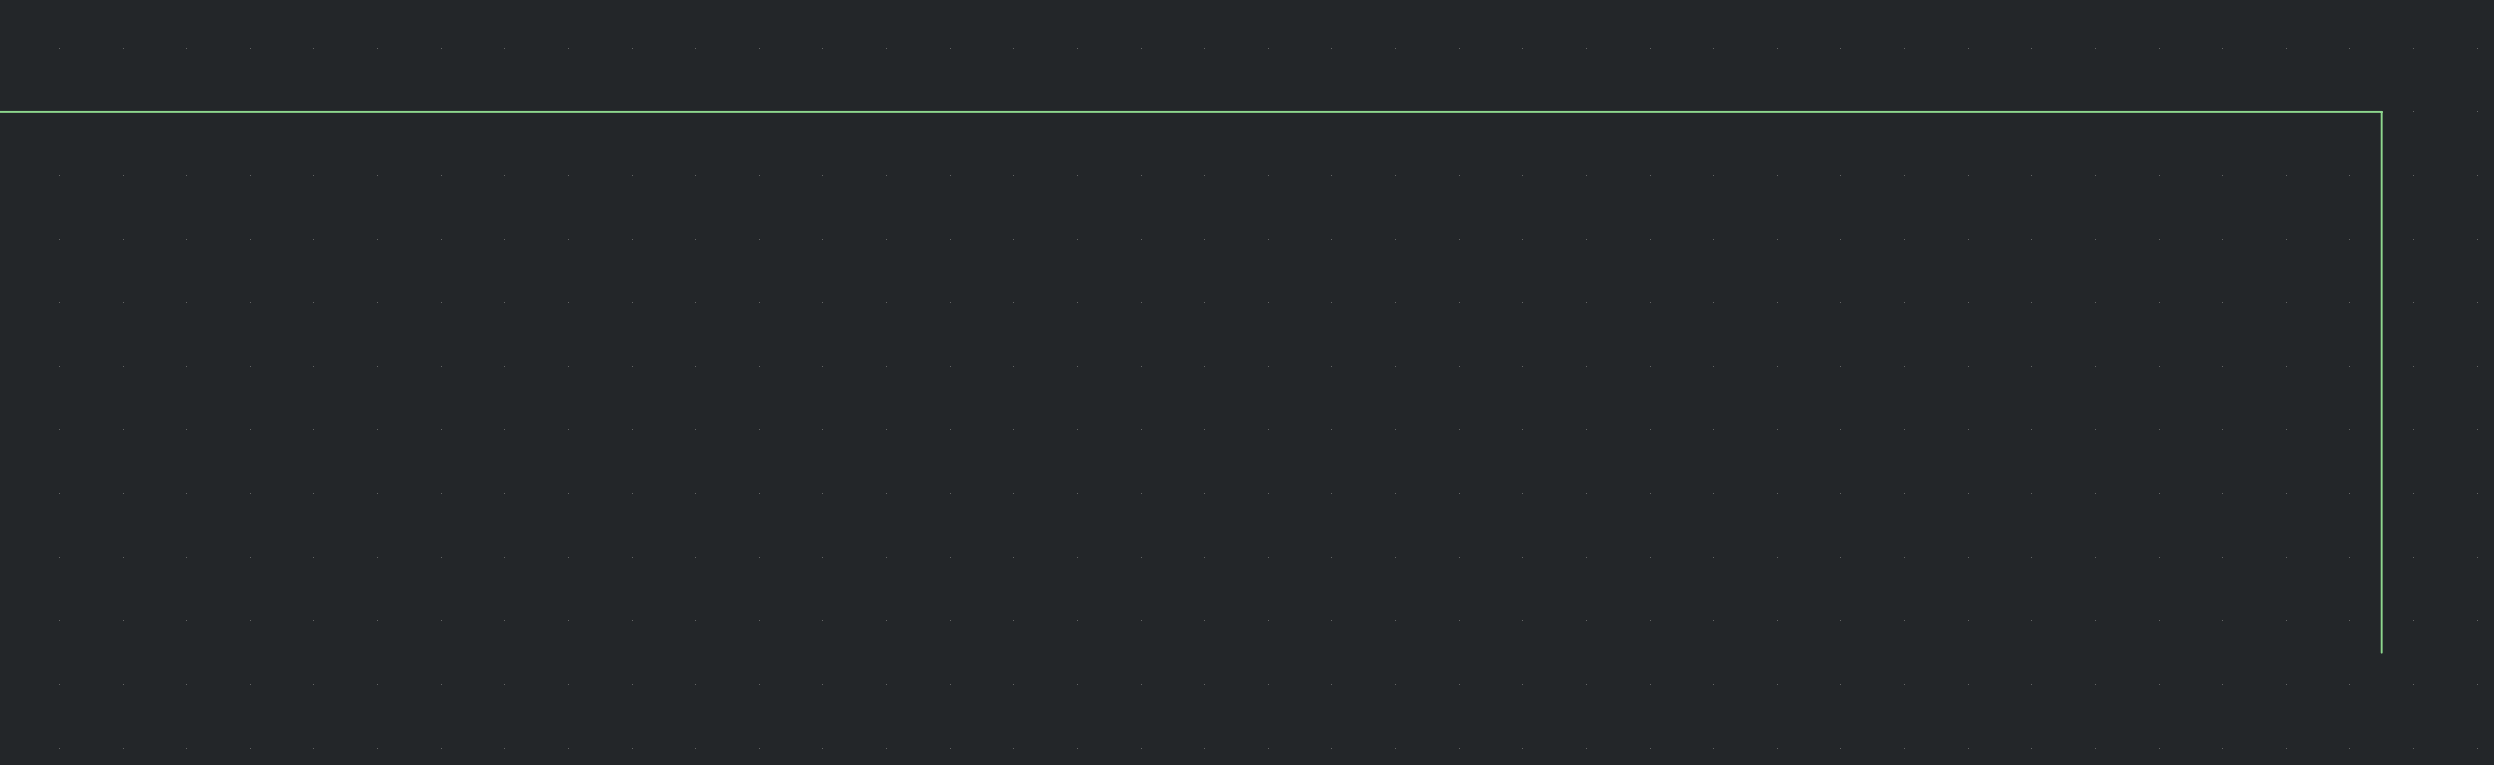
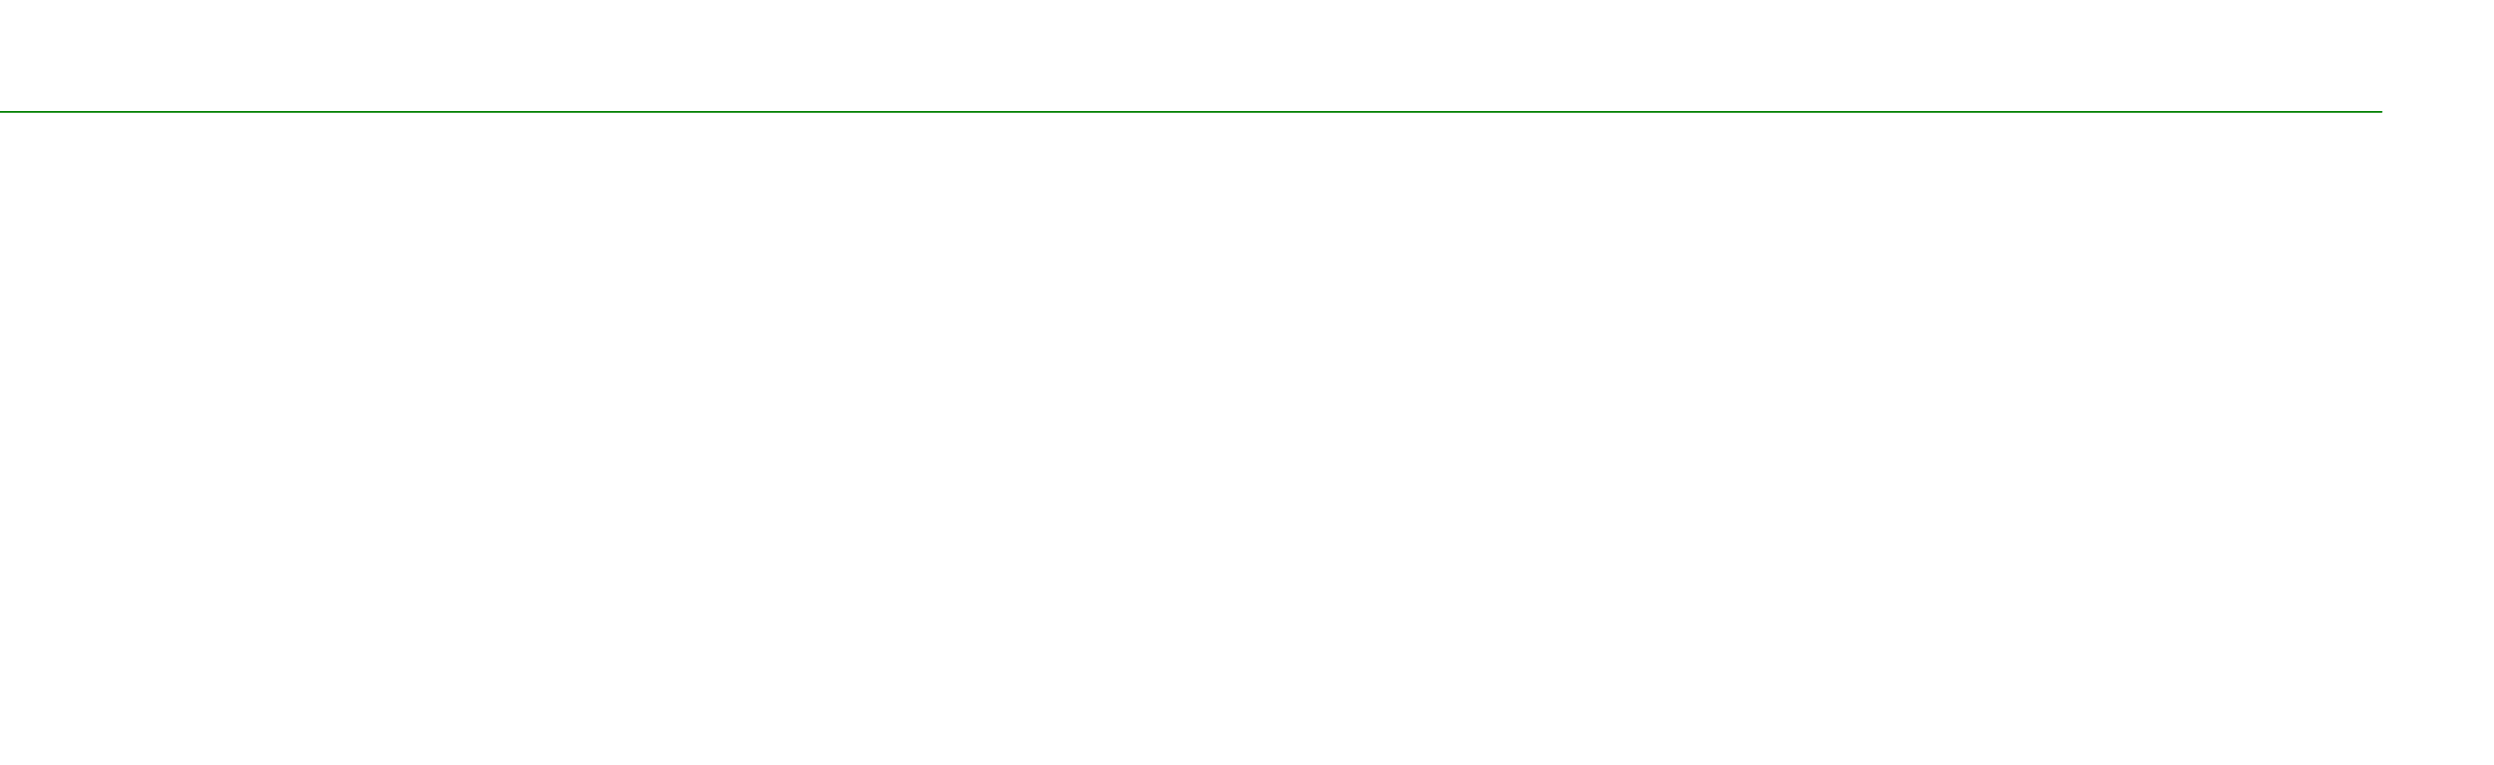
wire: (2381, 111) (2381, 652) -> none

